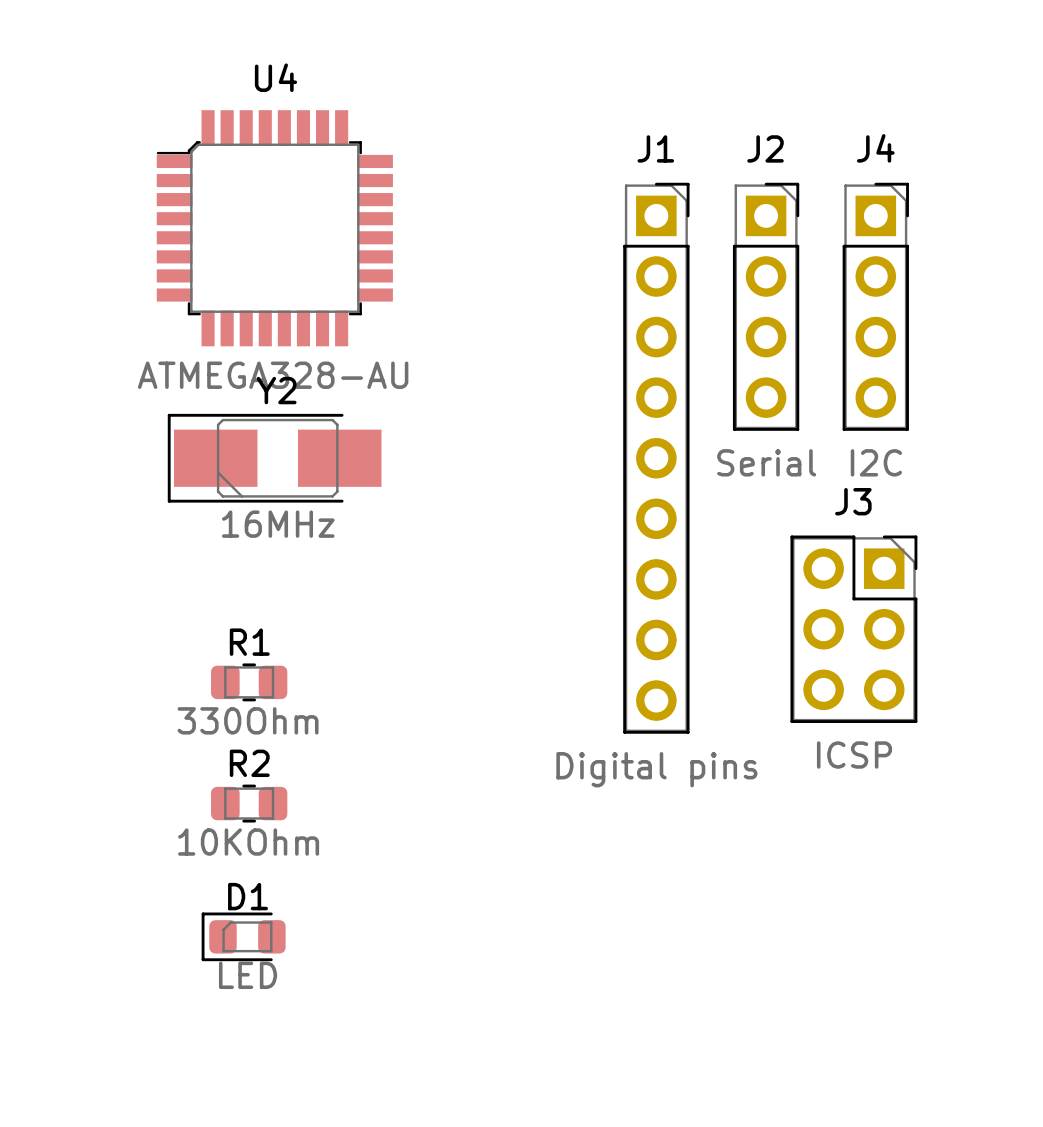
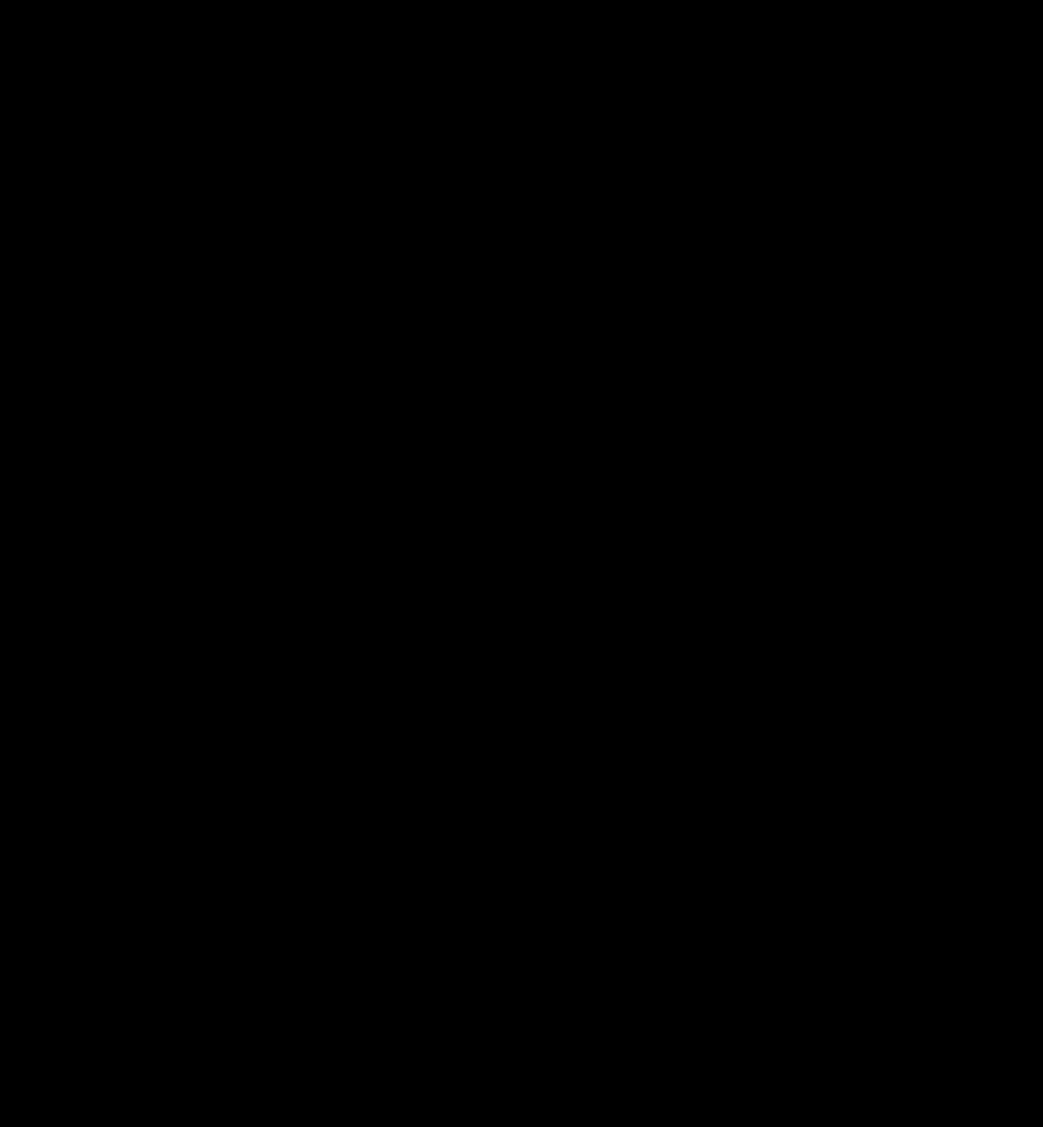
U4: ATMEGA328-AU (274, 228) -> none
J2: Serial (766, 306) -> none
J4: I2C (875, 306) -> none
Y2: 16MHz (274, 458) -> none
J1: Digital pins (656, 458) -> none
J3: ICSP (853, 629) -> none
R1: 330Ohm (249, 682) -> none
R2: 10KOhm (249, 803) -> none
D1: LED (243, 936) -> none

